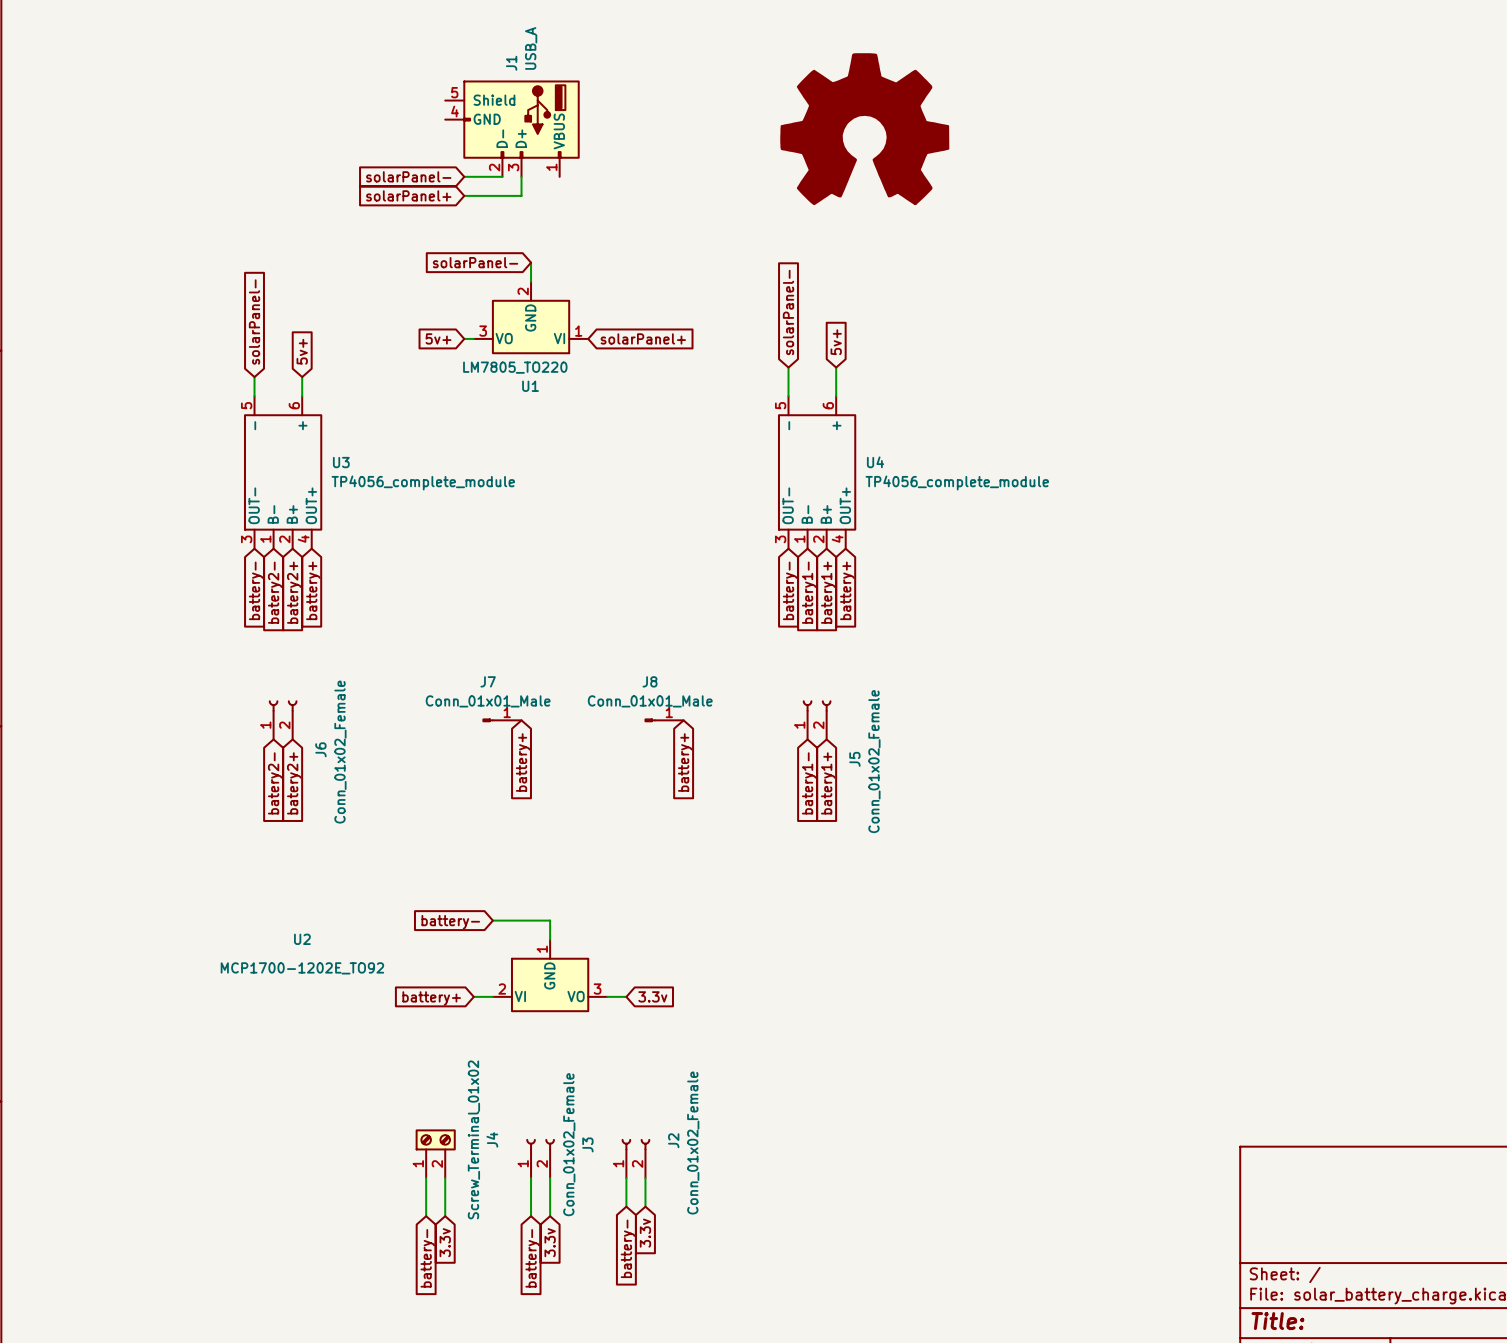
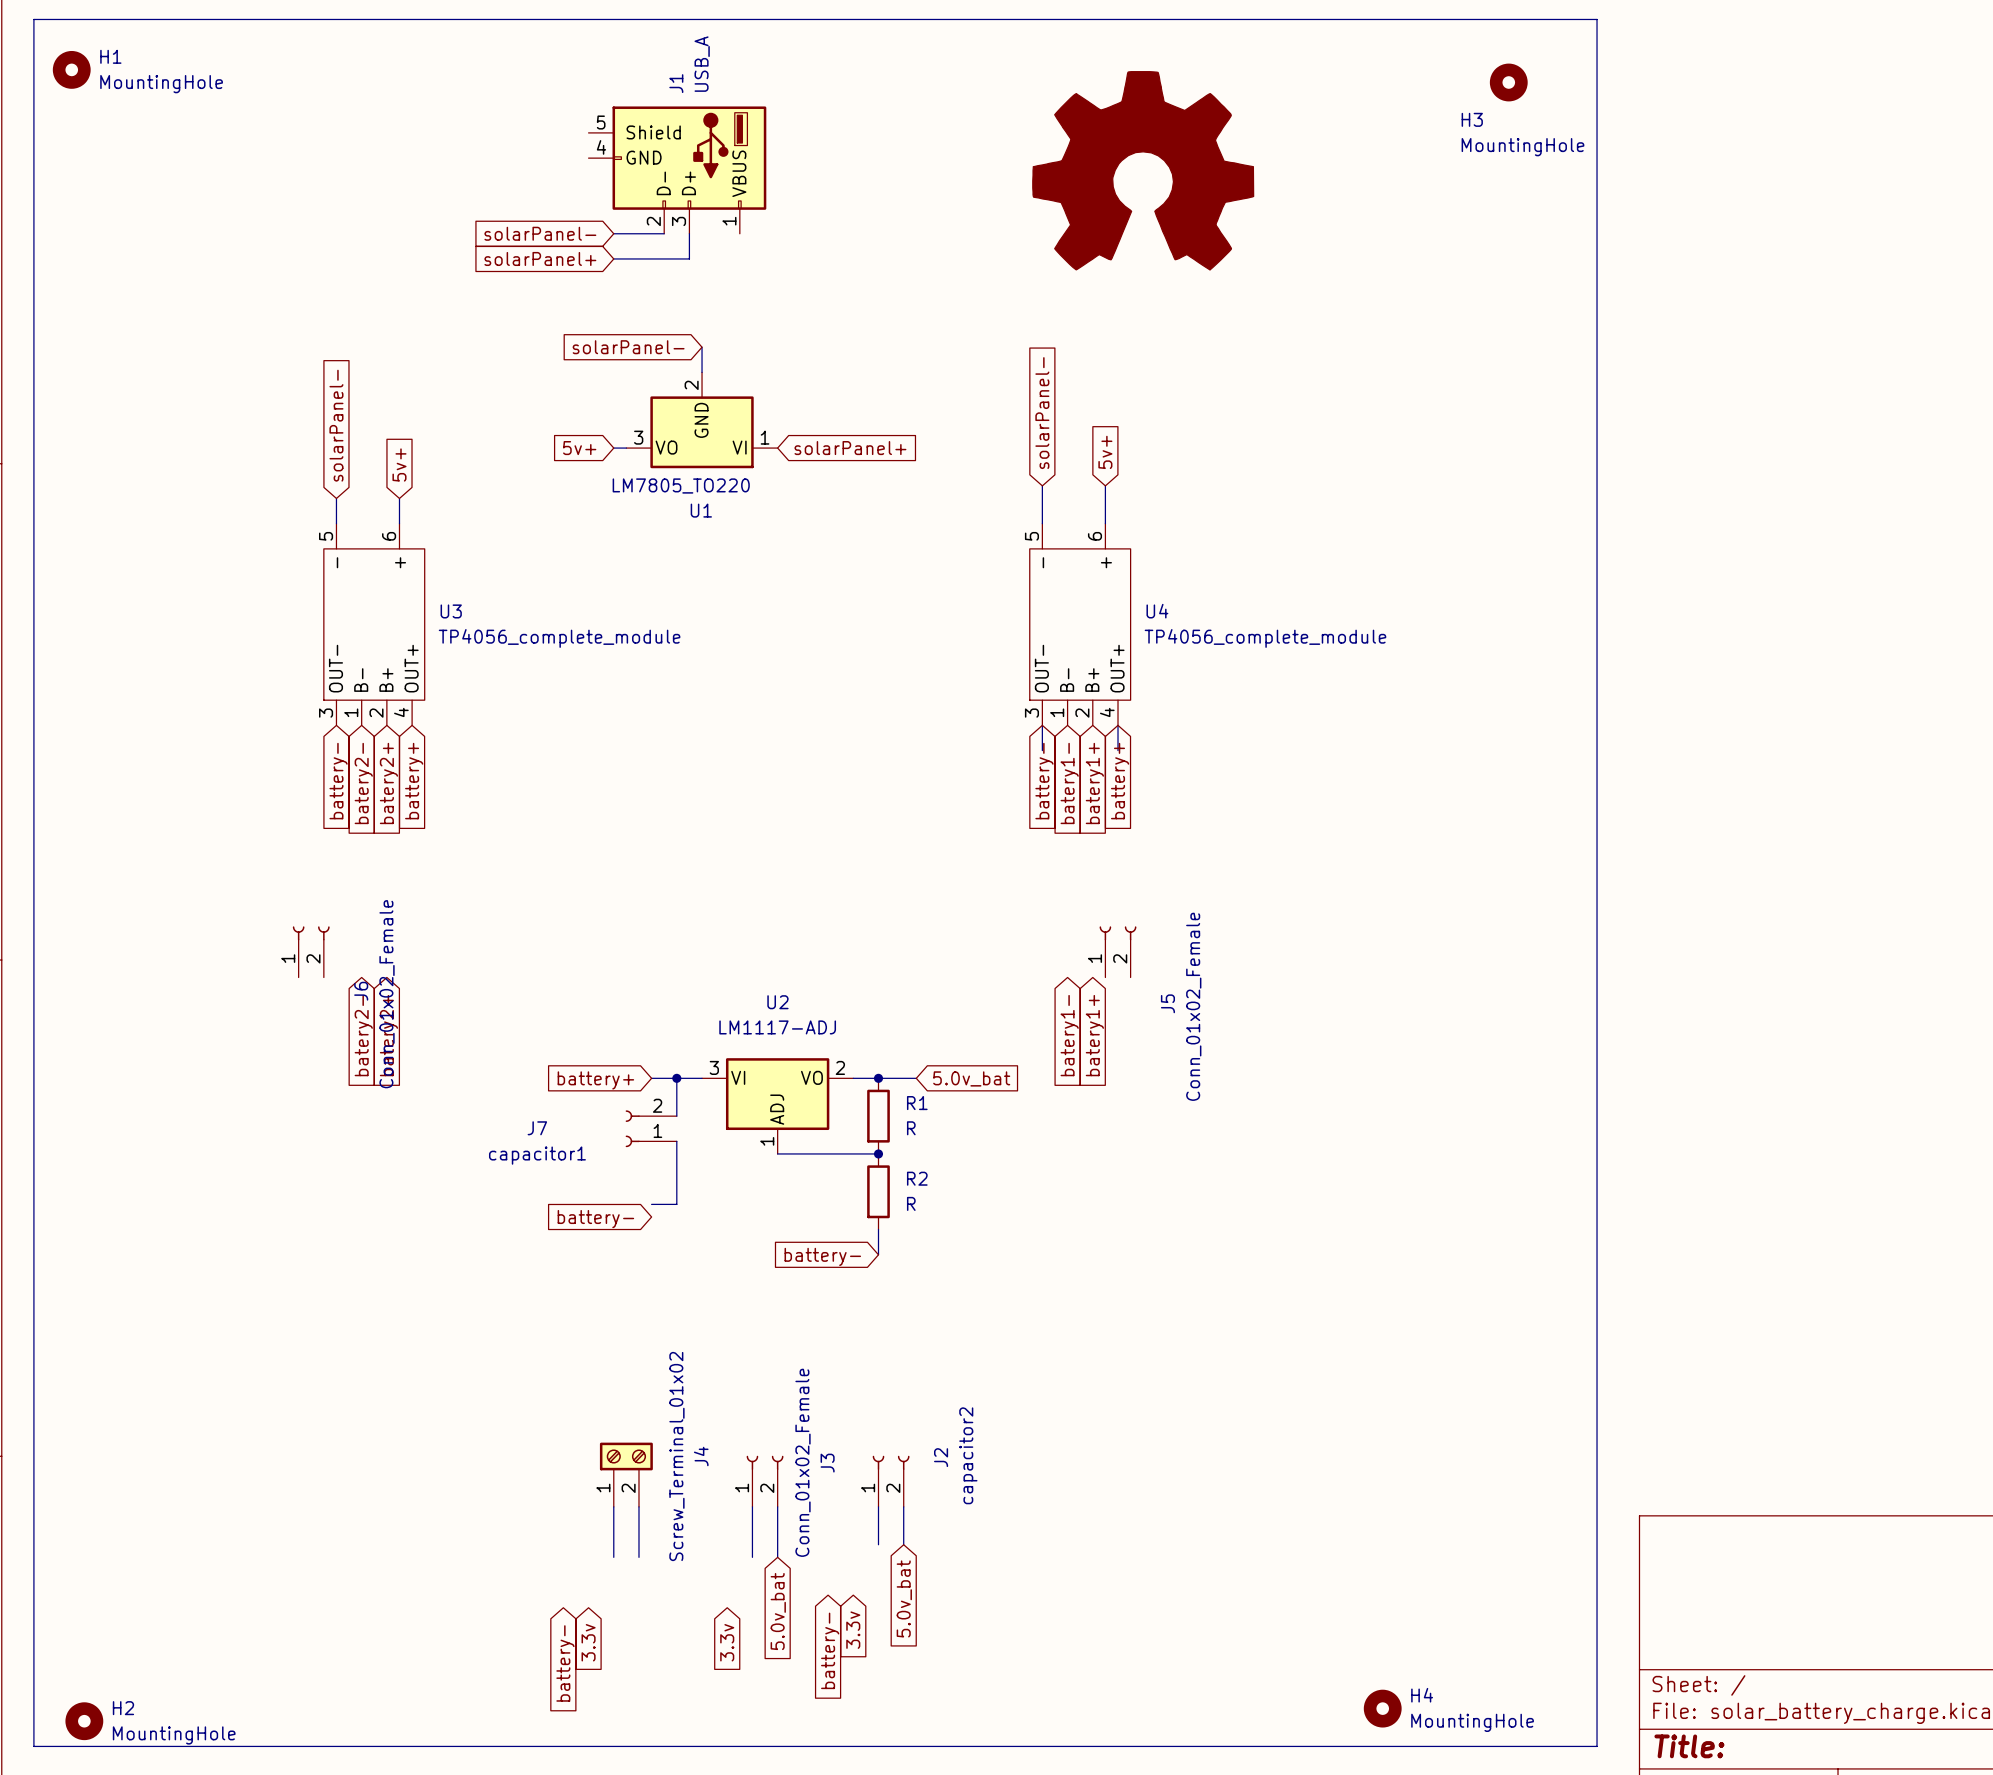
line: none -> (33, 19) (33, 1746) (1597, 1746) (1597, 19) (33, 19)
H1: none -> MountingHole (71, 69)
H3: none -> MountingHole (1508, 82)
wire: none -> (1042, 725) (1042, 750)
wire: none -> (1118, 725) (1118, 750)
J7 name position: J7 (488, 681) -> J7 (537, 1128)
J7 value: Conn_01x01_Male (488, 701) -> capacitor1 (537, 1155)
J7 symbol: [482, 718, 522, 722] -> [625, 1110, 677, 1148]
J6 position: (283, 720) -> (311, 951)
J8: Conn_01x01_Male (664, 720) -> none
J5 position: (817, 720) -> (1118, 951)
global label: battery+ (523, 762) -> none
global label: battery+ (685, 762) -> none
wire: none -> (651, 1078) (702, 1078)
wire: none -> (676, 1078) (676, 1116)
junction: none -> (676, 1078)
wire: none -> (853, 1078) (916, 1078)
junction: none -> (878, 1078)
global label: none -> 5.0v_bat (971, 1078)
global label: none -> battery+ (595, 1080)
R1: none -> R (878, 1116)
wire: none -> (676, 1141) (676, 1204) (651, 1204)
wire: none -> (777, 1153) (878, 1153)
junction: none -> (878, 1153)
R2: none -> R (878, 1191)
wire: (492, 920) (550, 920) (550, 939) -> none
wire: none -> (878, 1229) (878, 1254)
U2 name position: U2 (302, 939) -> U2 (777, 1002)
U2 symbol: [492, 939, 608, 1013] -> [702, 1058, 854, 1154]
global label: none -> battery- (822, 1256)
U2 value: MCP1700-1202E_TO92 (302, 968) -> LM1117-ADJ (777, 1027)
wire: (473, 996) (492, 996) -> none
wire: (607, 996) (626, 996) -> none
global label: 3.3v (652, 996) -> none
global label: battery+ (431, 998) -> none
J2 value: Conn_01x02_Female (693, 1143) -> capacitor2 (968, 1455)
J4 position: (435, 1153) -> (626, 1474)
J3 position: (540, 1158) -> (765, 1481)
J2 position: (635, 1158) -> (891, 1481)
wire: (426, 1178) (426, 1216) -> (613, 1506) (613, 1557)
wire: (445, 1178) (445, 1216) -> (638, 1506) (638, 1557)
wire: (531, 1178) (531, 1216) -> (752, 1506) (752, 1557)
wire: (550, 1178) (550, 1216) -> (777, 1506) (777, 1557)
wire: (626, 1178) (626, 1206) -> (878, 1506) (878, 1544)
wire: (645, 1178) (645, 1206) -> (903, 1506) (903, 1544)
global label: none -> 5.0v_bat (904, 1598)
global label: none -> 5.0v_bat (778, 1611)
global label: battery- (532, 1258) -> none
H4: none -> MountingHole (1382, 1708)
H2: none -> MountingHole (84, 1721)

